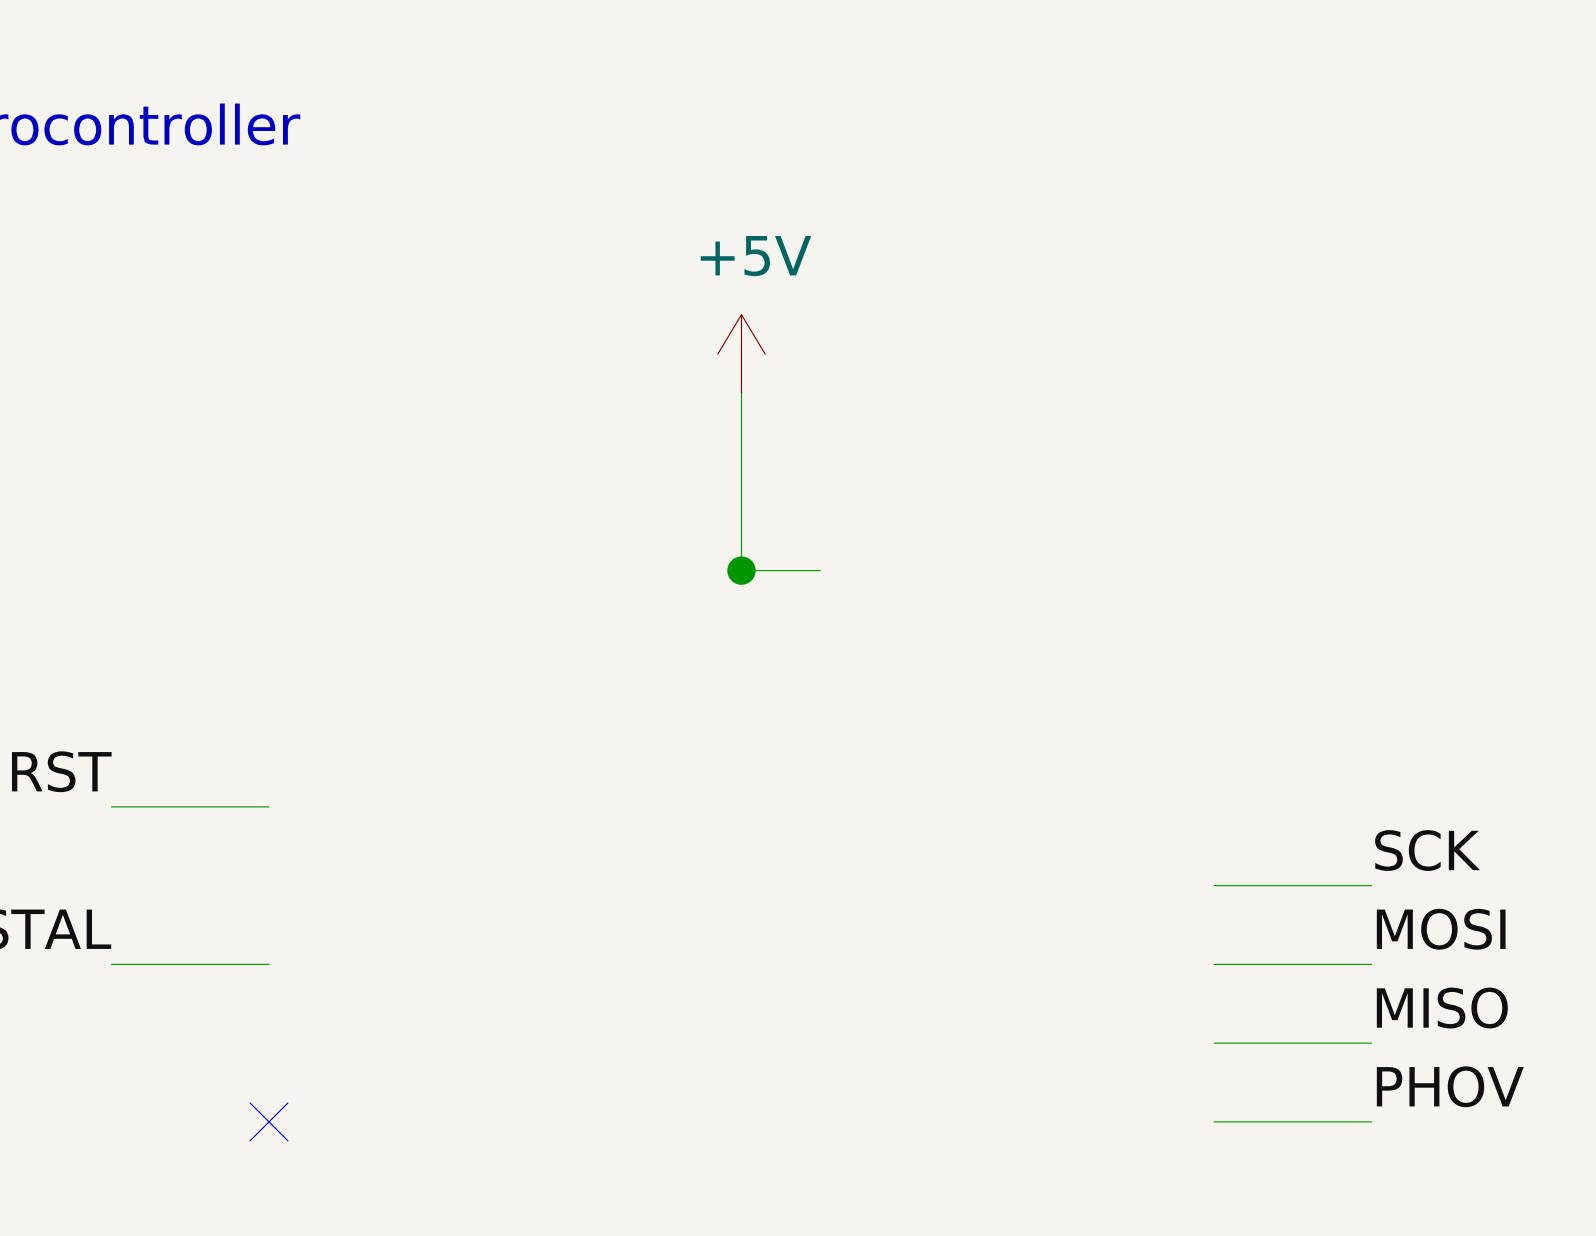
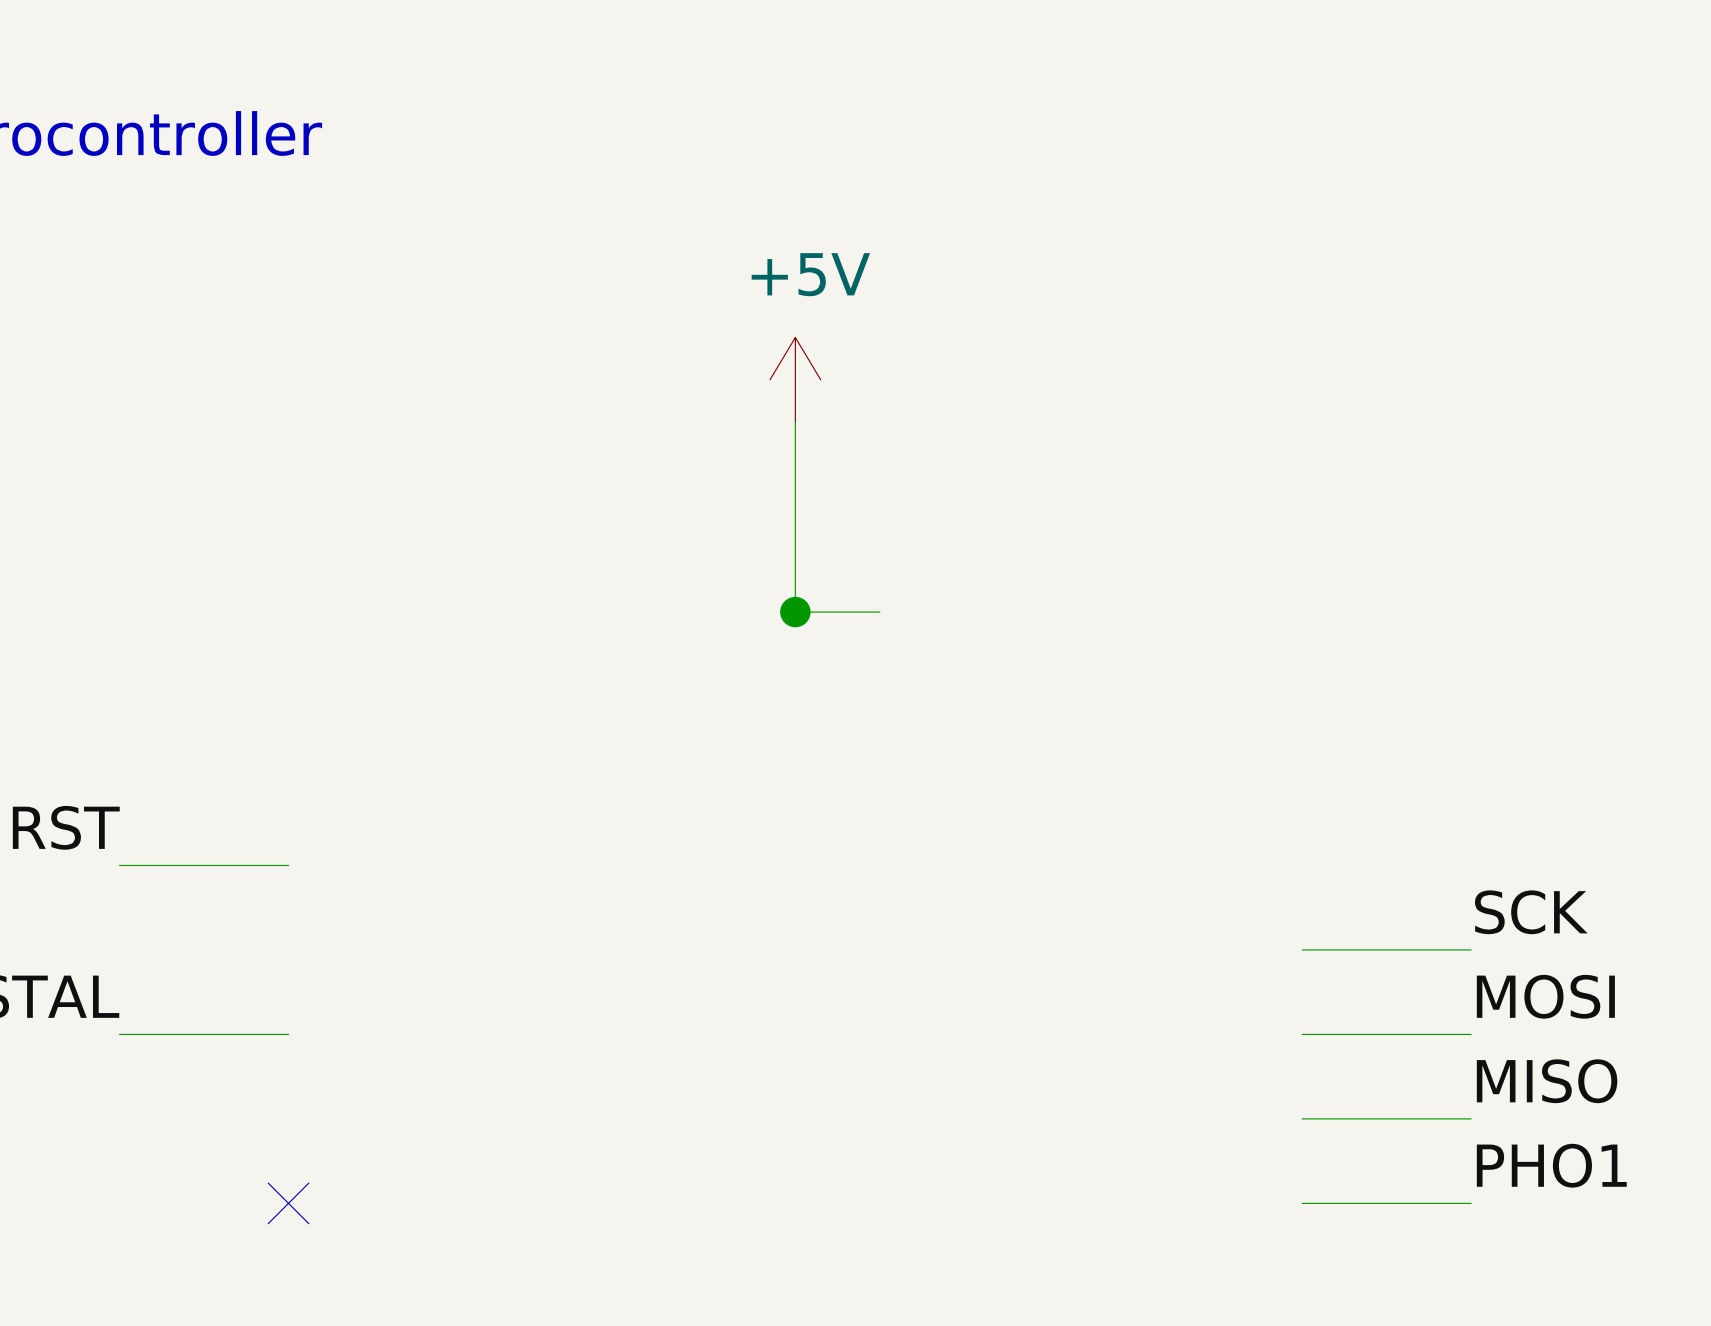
label: PHOV (1450, 1086) -> PHO1 (1551, 1165)

